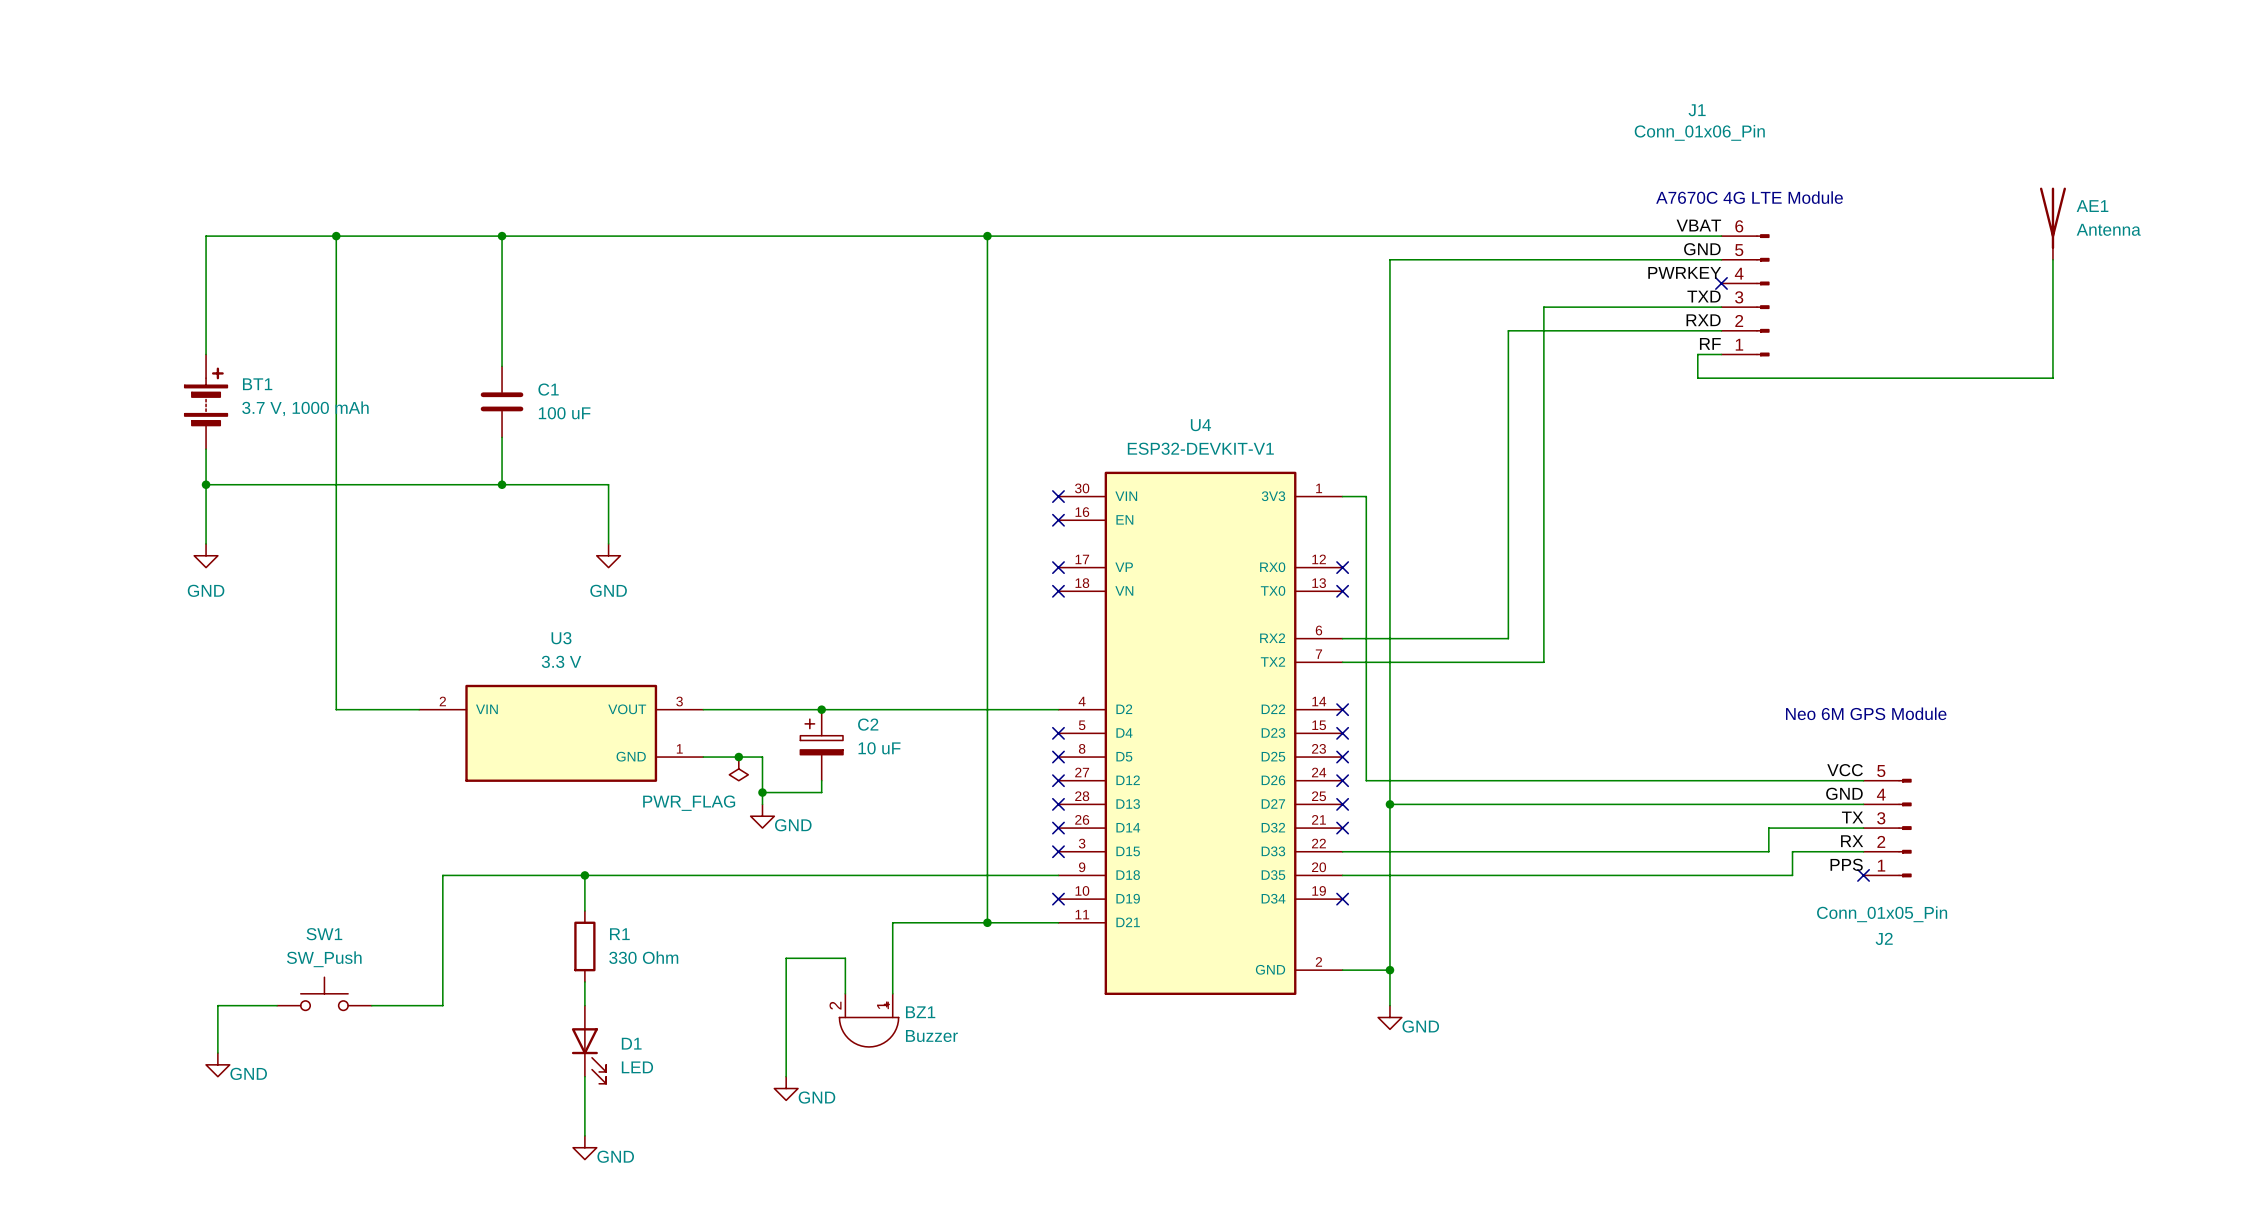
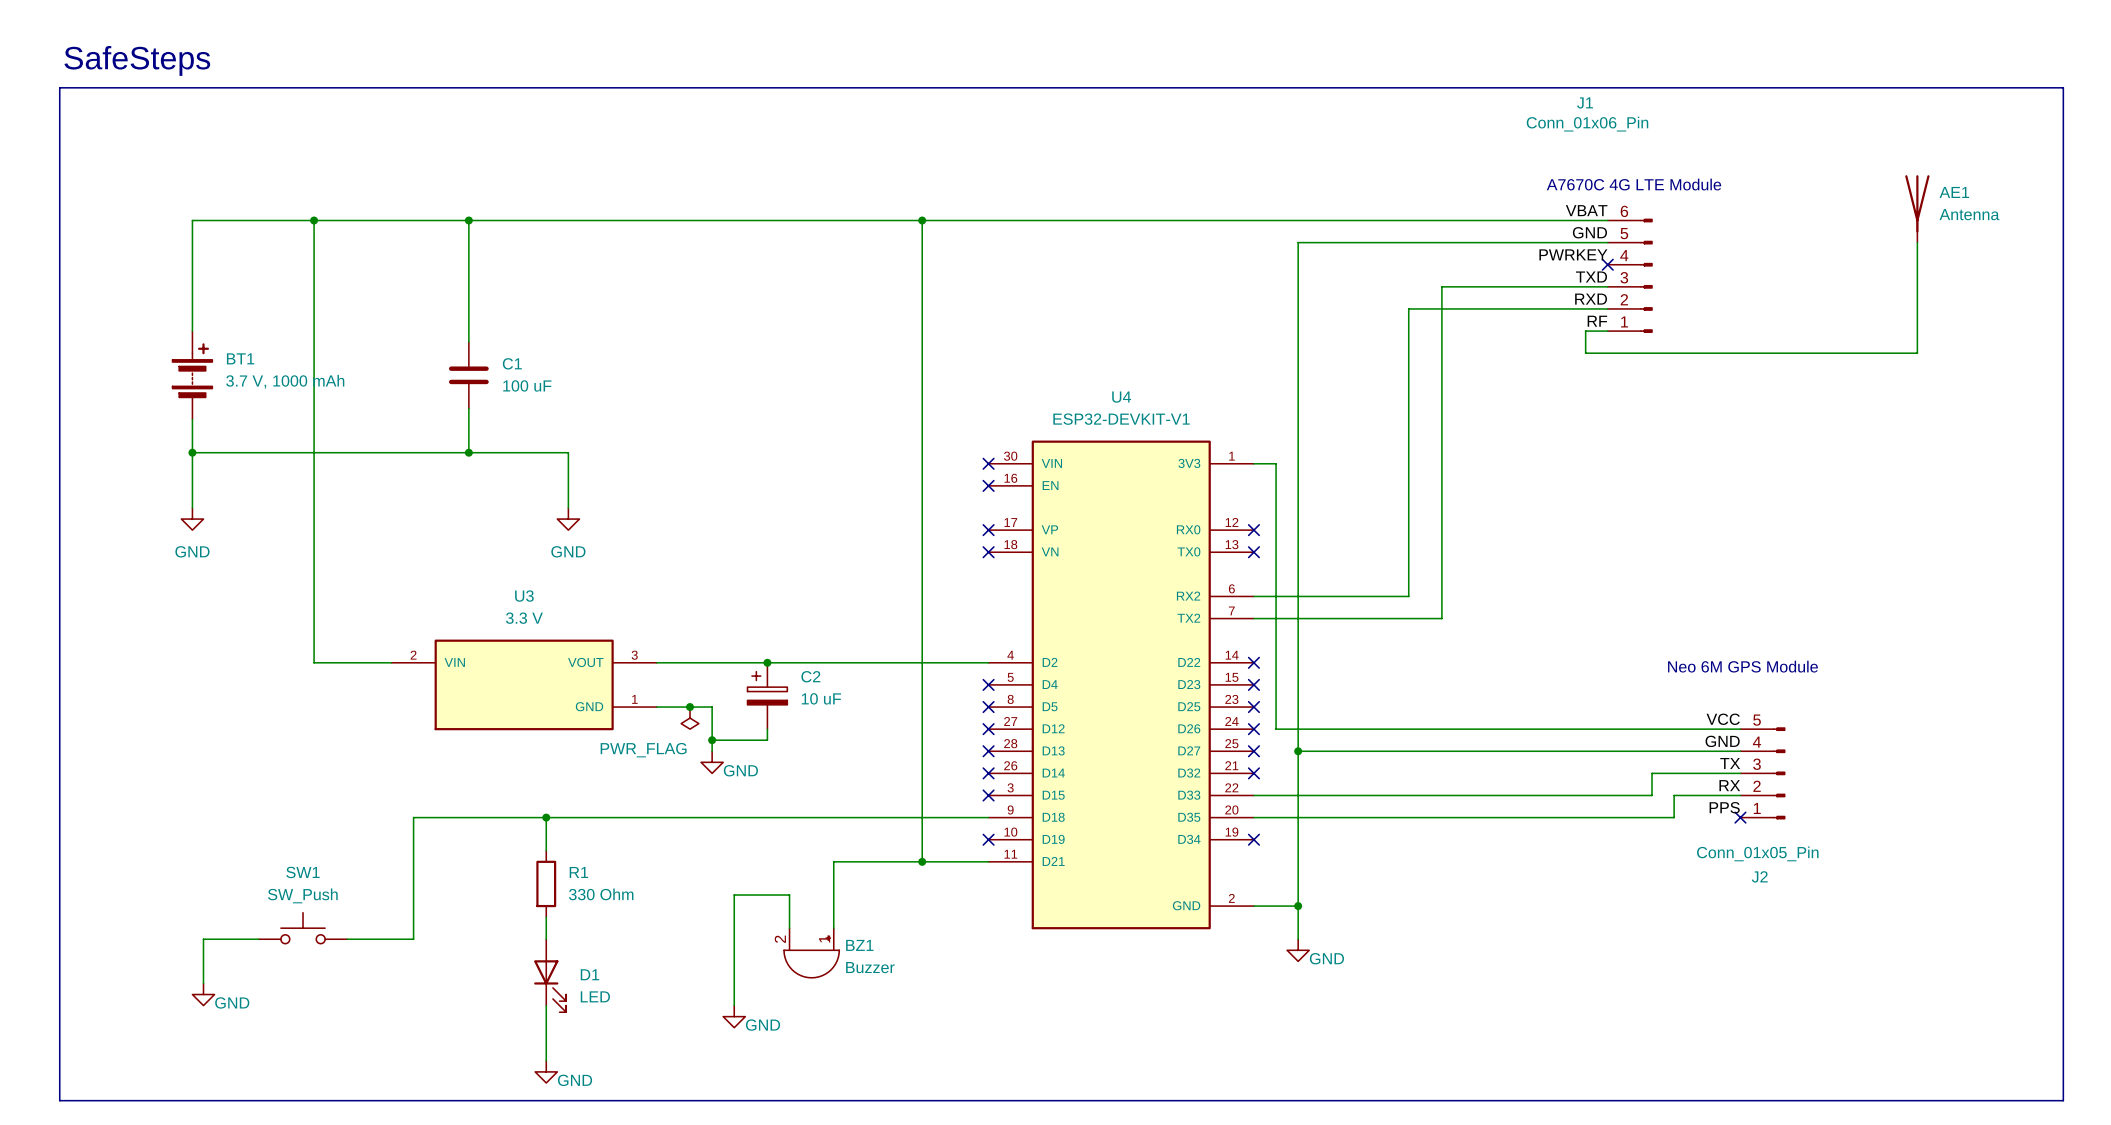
text: none -> SafeSteps (137, 60)
line: none -> (59, 87) (2063, 87) (2063, 1100) (59, 1100) (59, 87)

